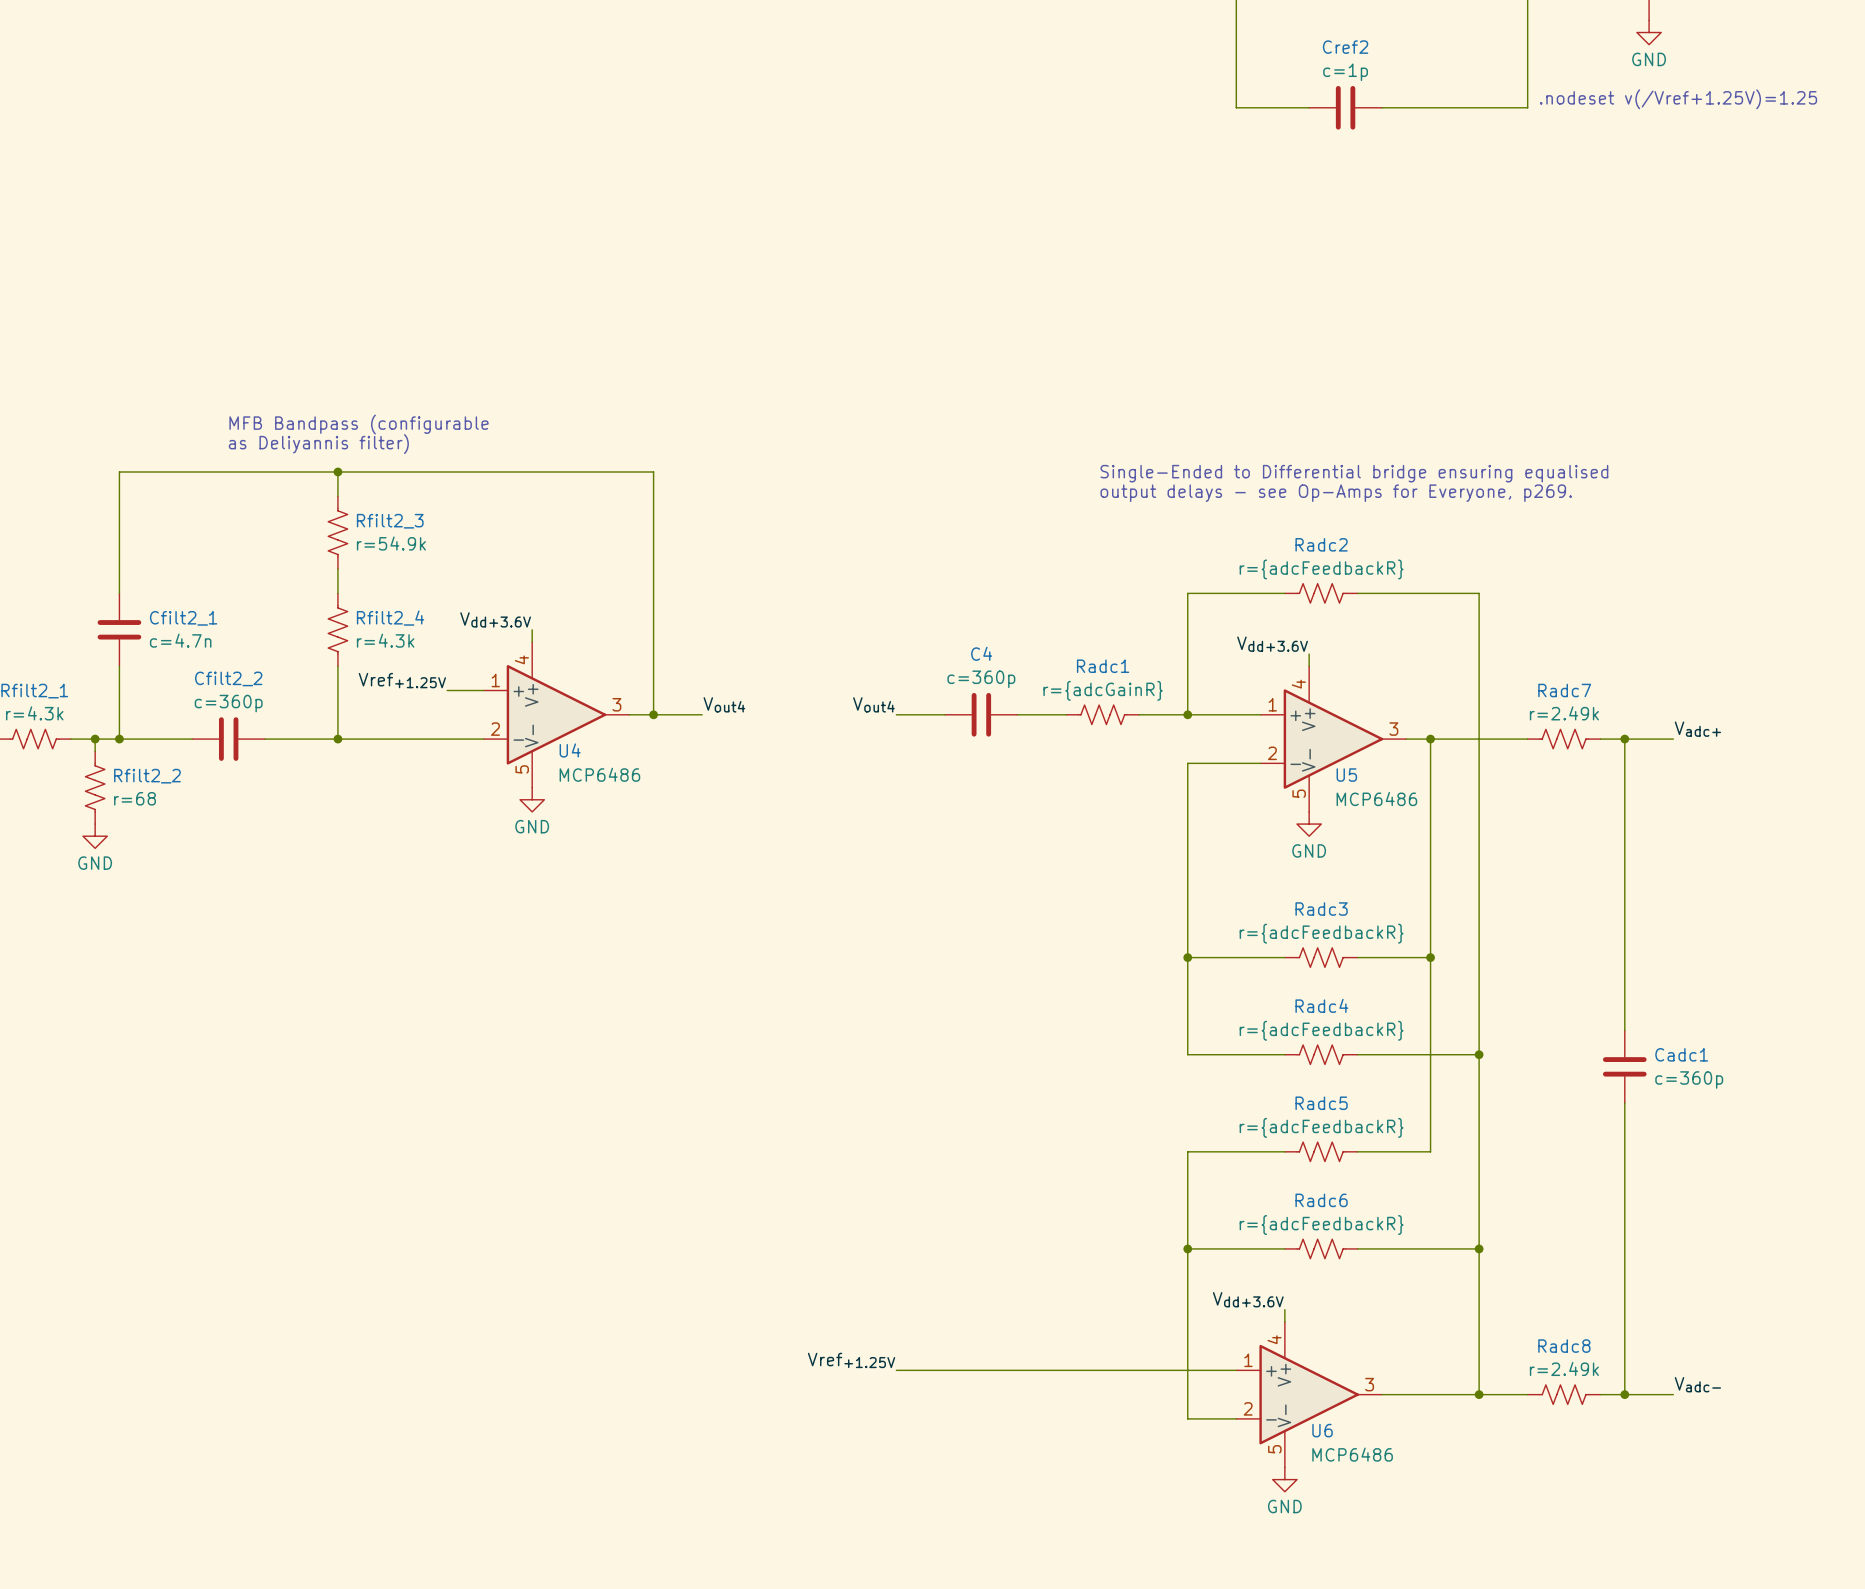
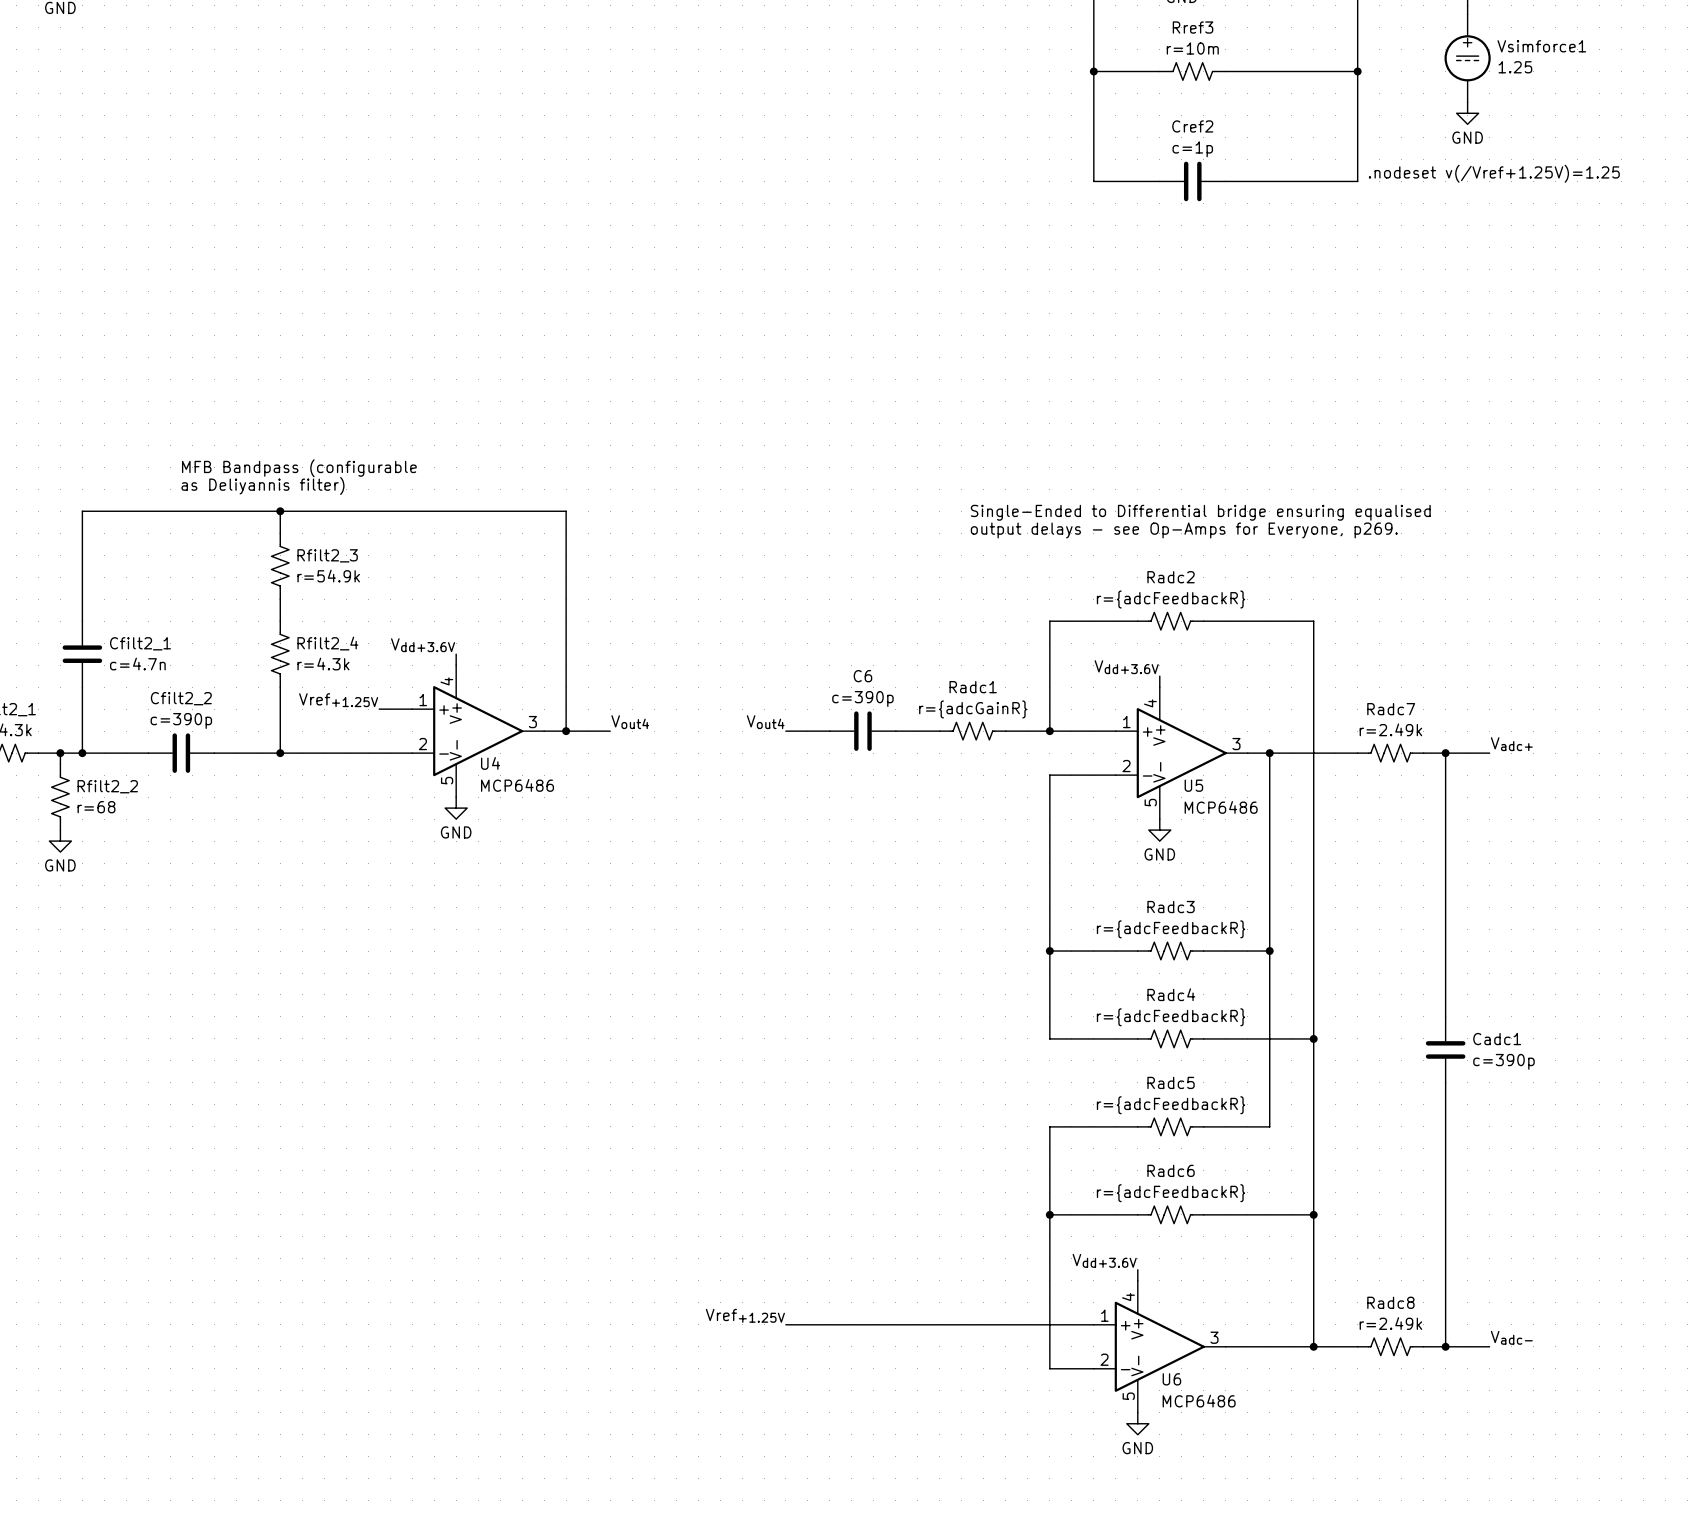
C4 name: C4 (981, 653) -> C6 (862, 676)
C4 value: c=360p (981, 679) -> c=390p (862, 698)
Cfilt2_2 value: c=360p (228, 703) -> c=390p (181, 720)
Cadc1 value: c=360p (1689, 1080) -> c=390p (1503, 1061)

